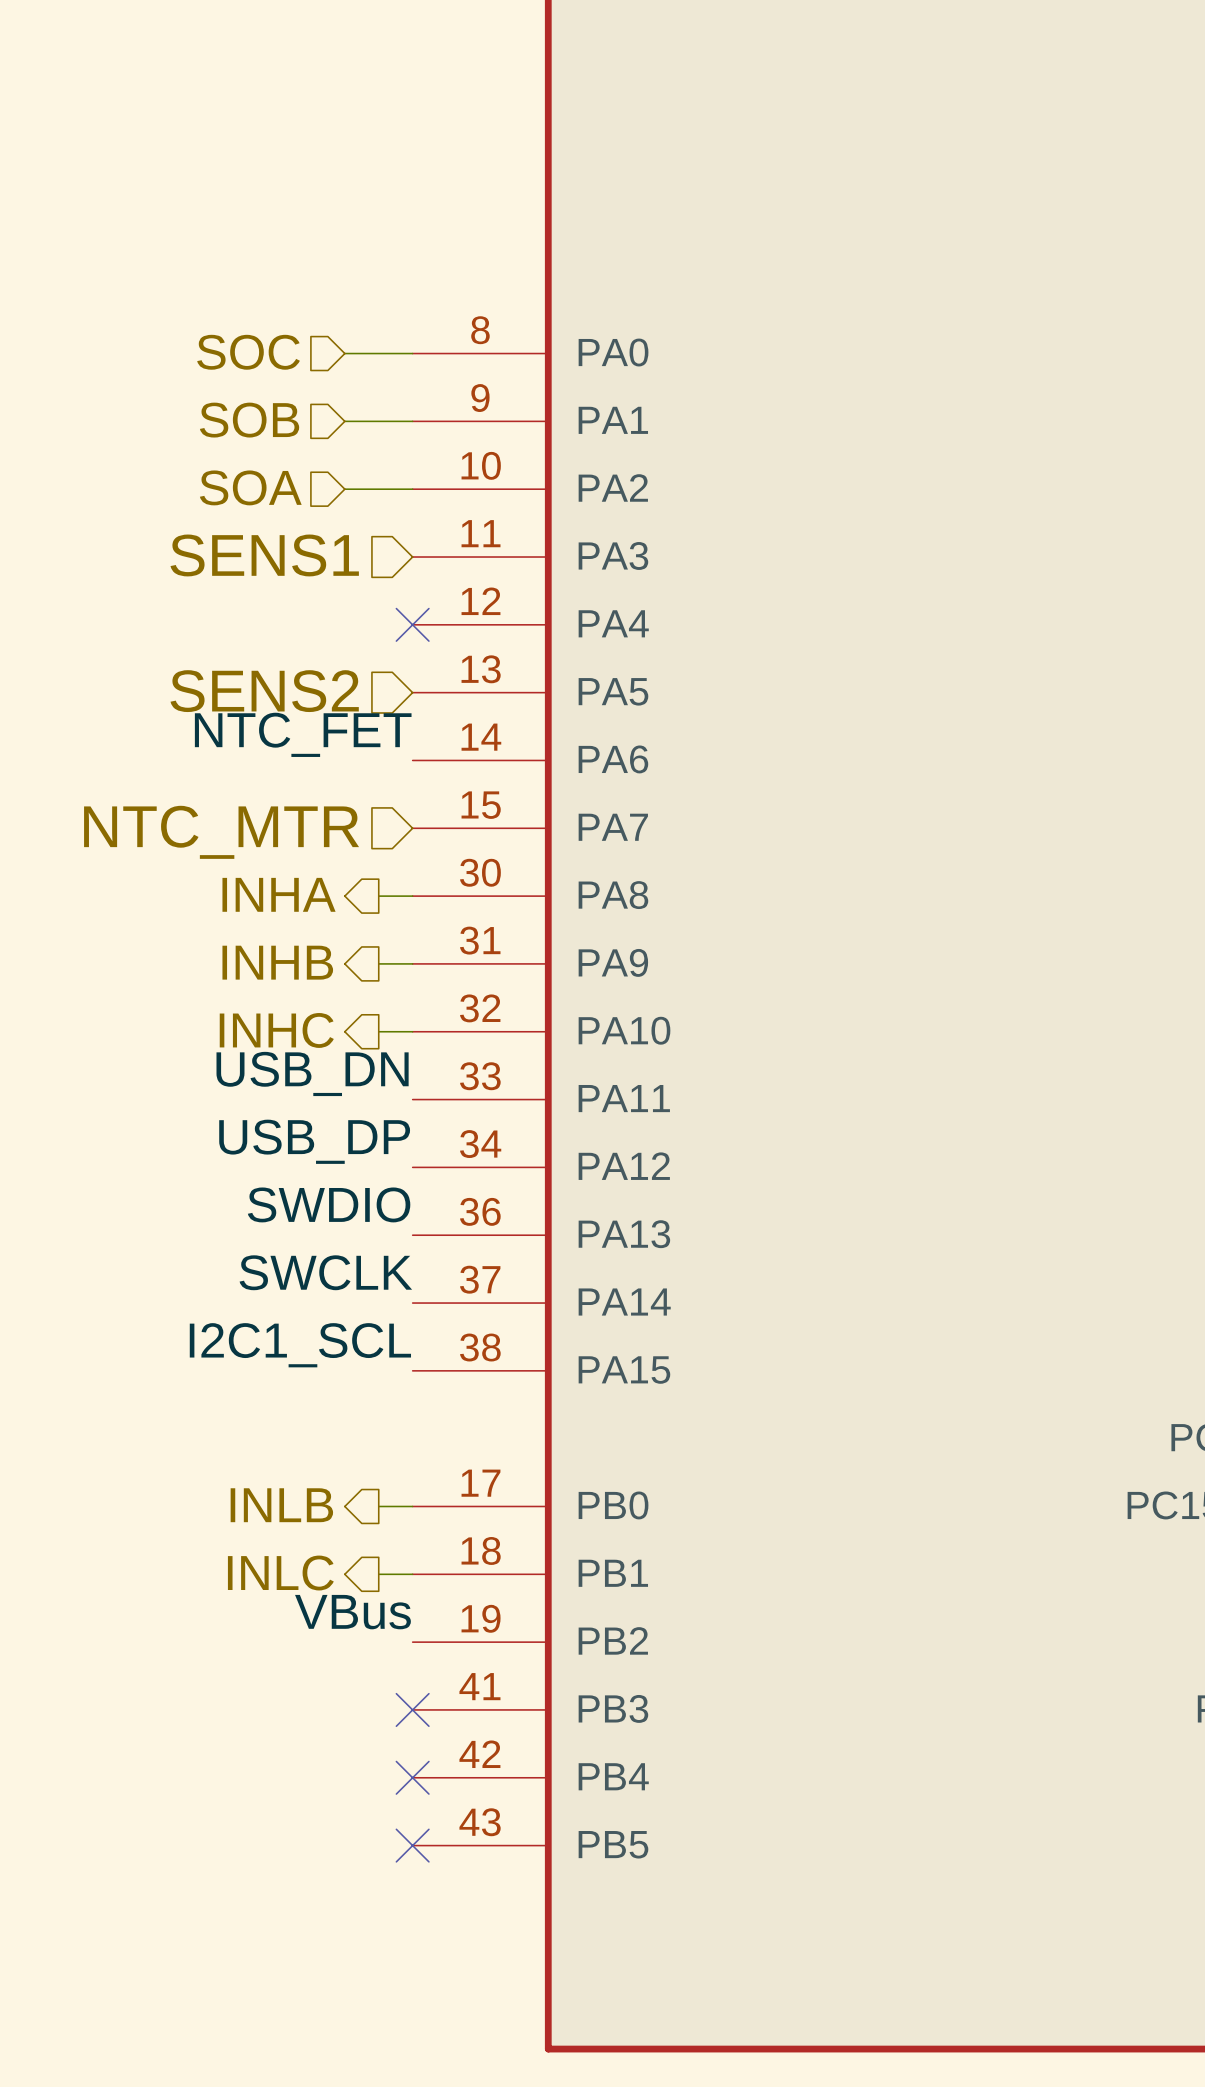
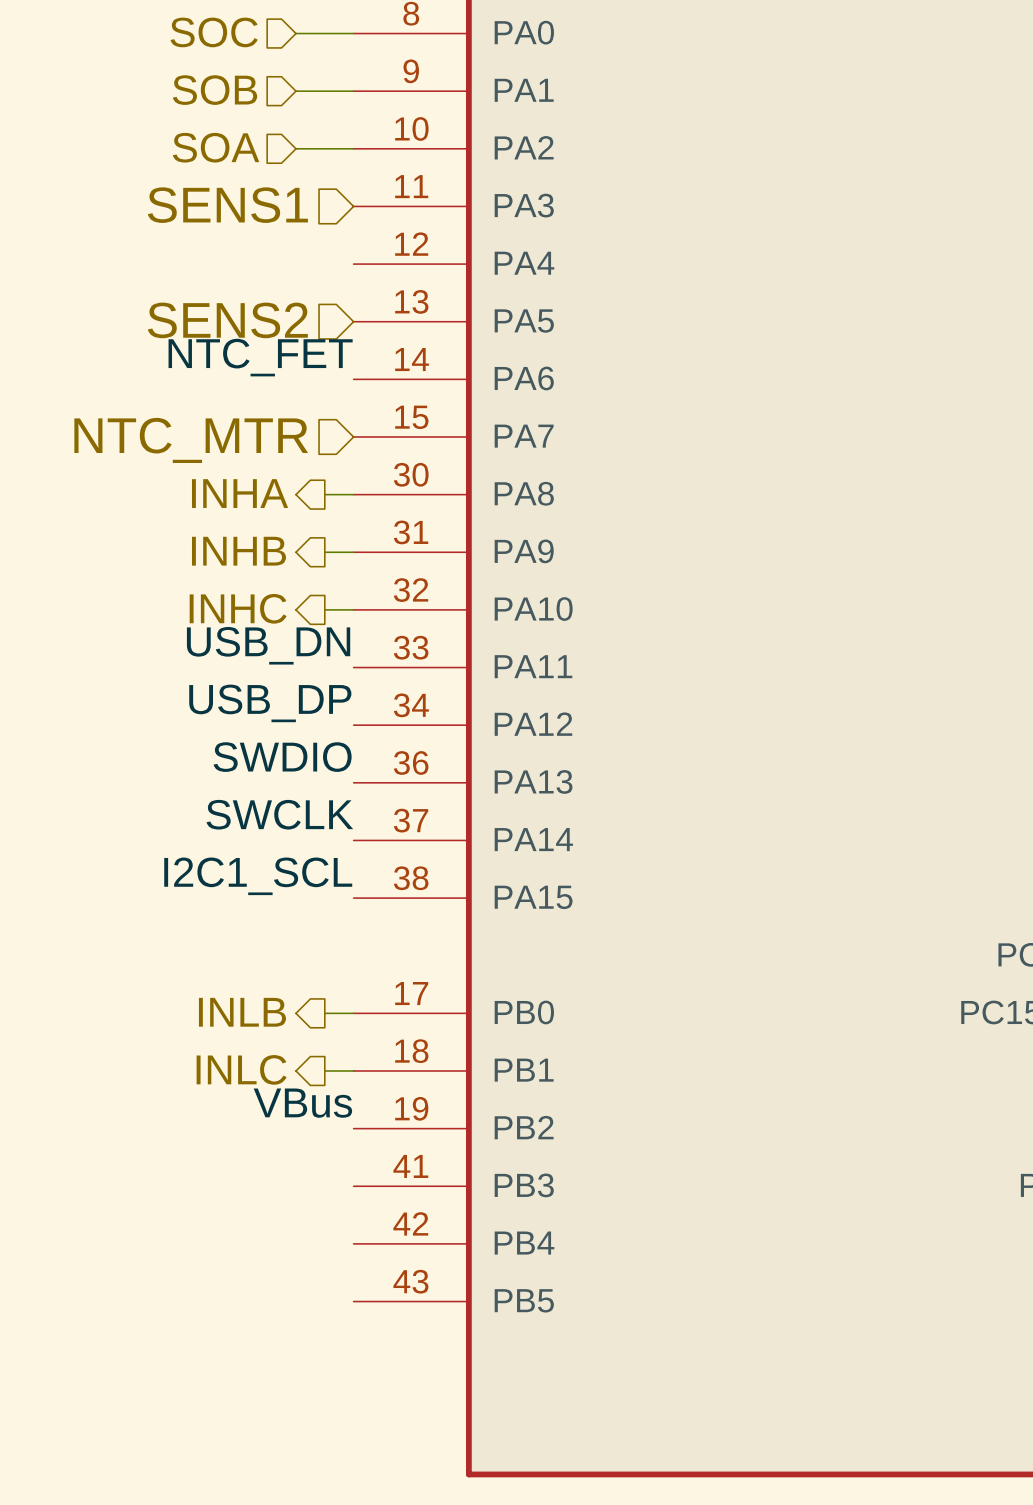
no-connect mark: (412, 624) -> none
no-connect mark: (412, 1709) -> none
no-connect mark: (412, 1777) -> none
no-connect mark: (412, 1845) -> none

